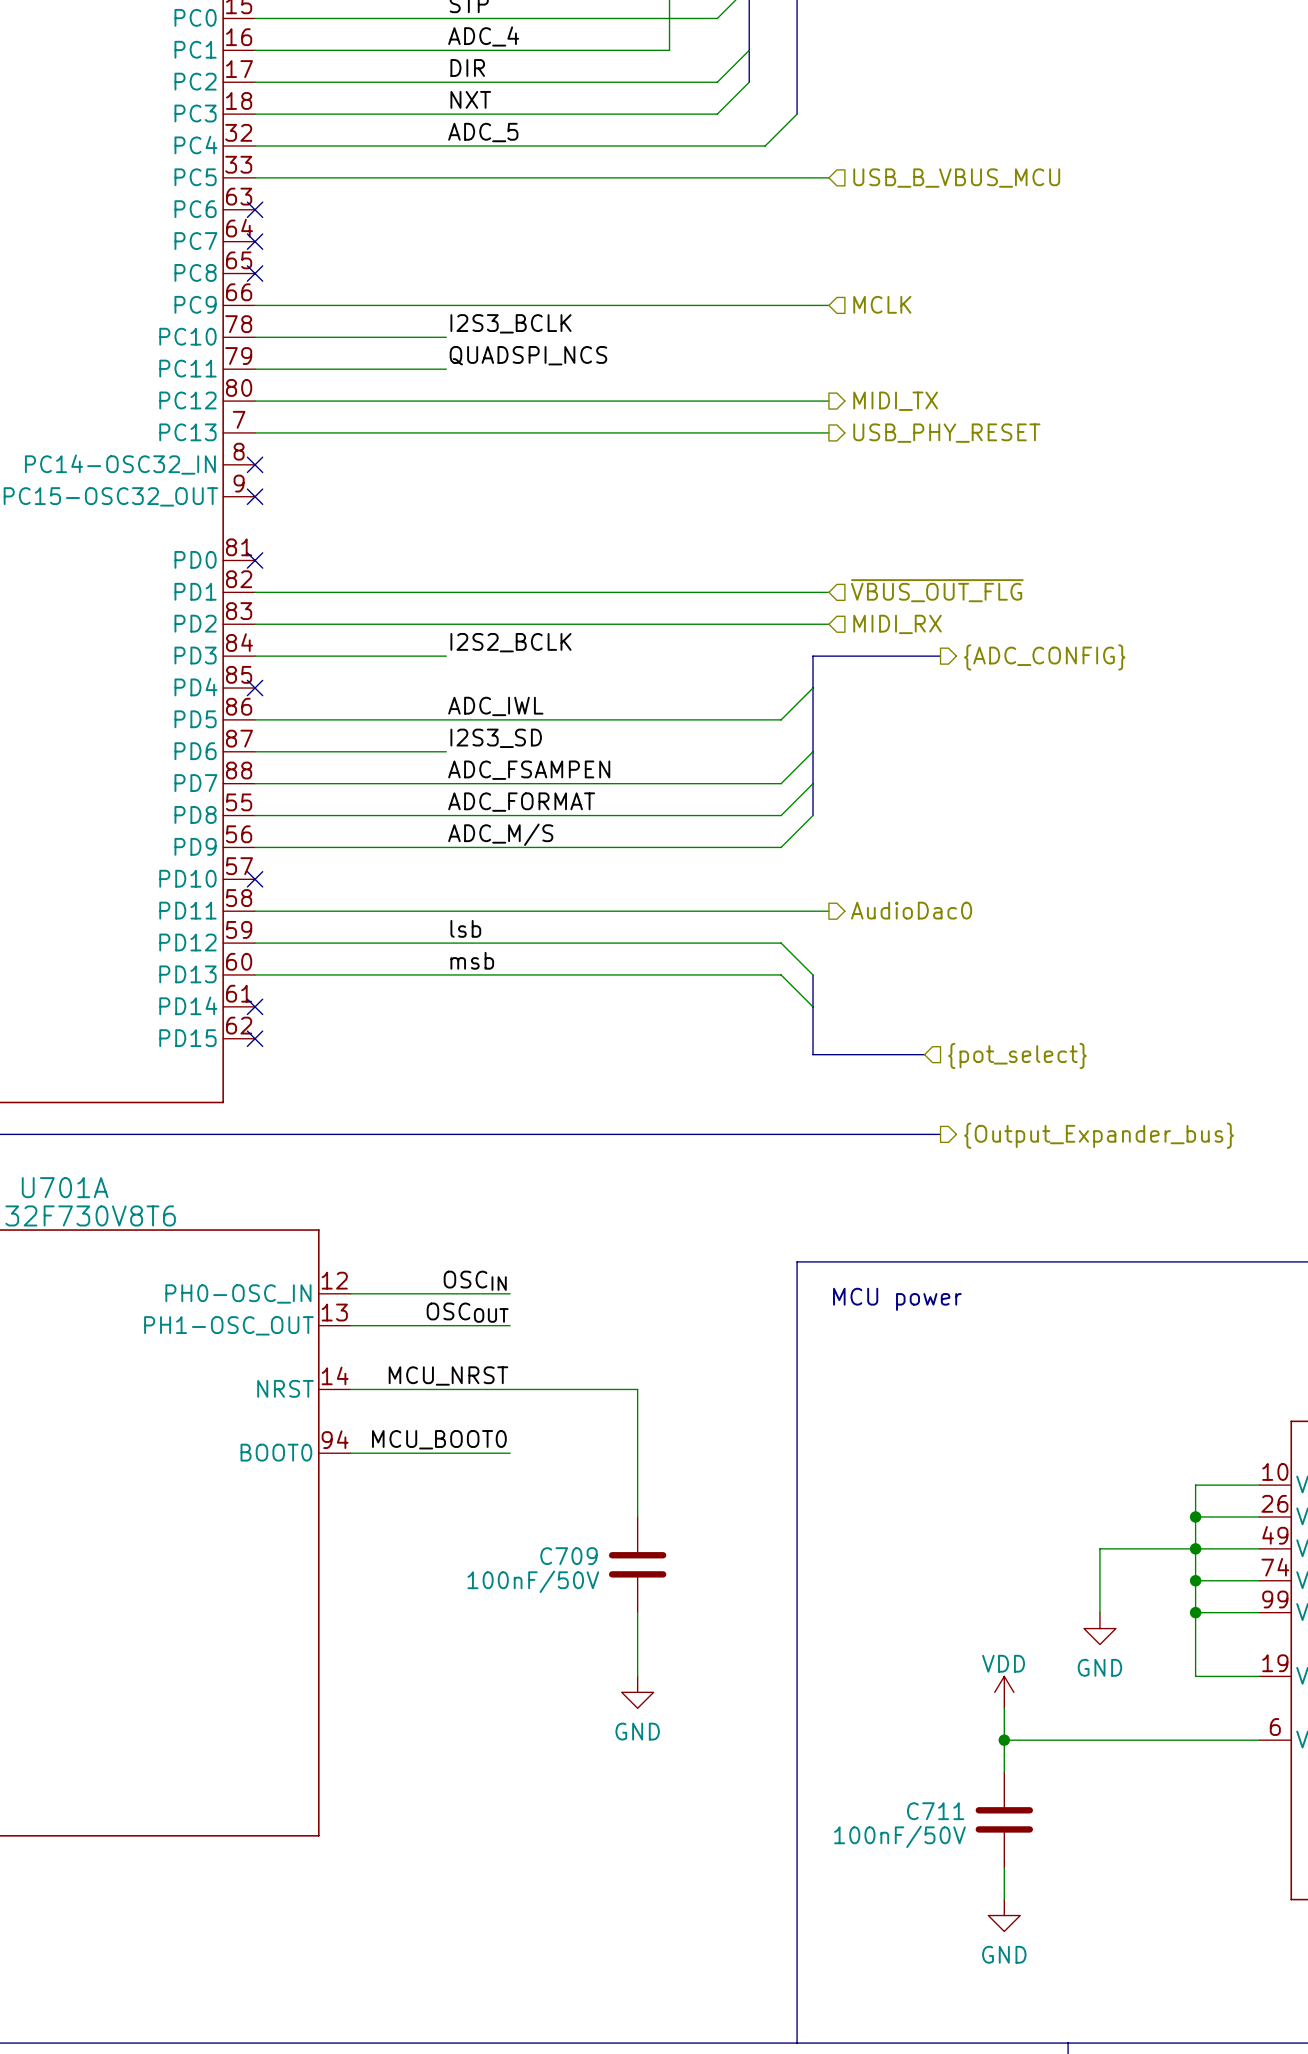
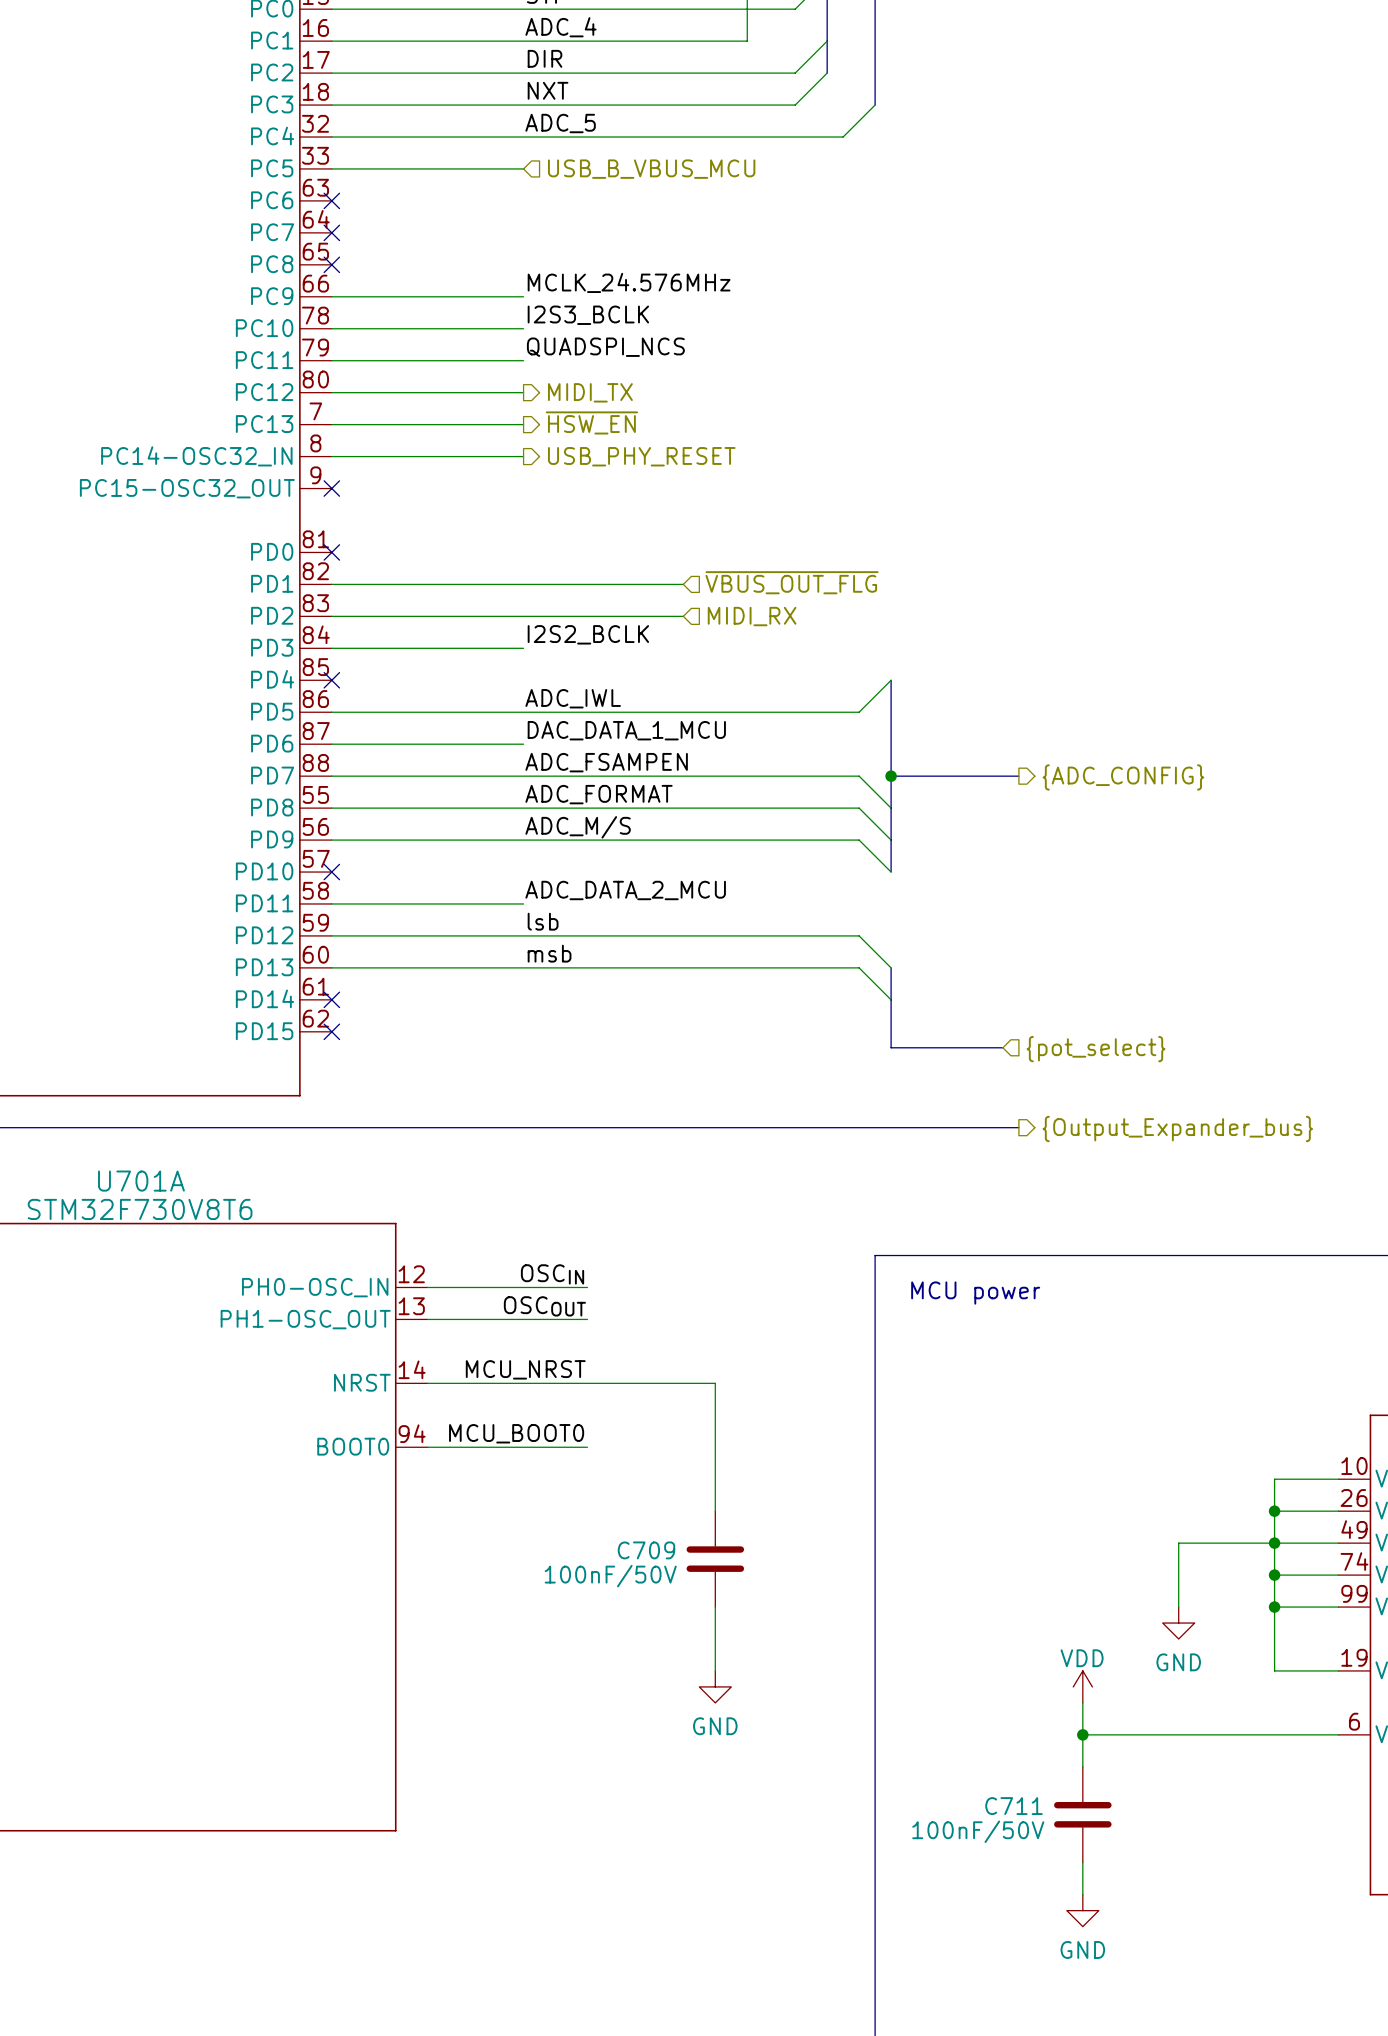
wire: (446, 177) (828, 177) -> none
hierarchical label: none -> USB_B_VBUS_MCU (651, 169)
hierarchical label: USB_B_VBUS_MCU (956, 178) -> none
label: none -> MCLK_24.576MHz (629, 282)
hierarchical label: MCLK (882, 304) -> none
wire: (446, 305) (828, 305) -> none
wire: (446, 401) (828, 401) -> none
hierarchical label: none -> MIDI_TX (590, 392)
hierarchical label: MIDI_TX (895, 401) -> none
hierarchical label: none -> ~{HSW_EN} (591, 422)
wire: (446, 432) (828, 432) -> none
hierarchical label: USB_PHY_RESET (946, 433) -> none
wire: none -> (331, 456) (523, 456)
no-connect mark: (255, 464) -> none
hierarchical label: none -> USB_PHY_RESET (641, 456)
hierarchical label position: ~{VBUS_OUT_FLG} (937, 590) -> ~{VBUS_OUT_FLG} (792, 582)
wire: (605, 592) (828, 592) -> none
wire: (605, 624) (828, 624) -> none
hierarchical label position: MIDI_RX (897, 624) -> MIDI_RX (752, 616)
bus: (940, 656) (813, 656) (813, 688) -> none
hierarchical label position: {ADC_CONFIG} (1044, 657) -> {ADC_CONFIG} (1123, 777)
label: I2S3_SD (496, 738) -> DAC_DATA_1_MCU (626, 730)
wire: (813, 751) (781, 783) -> none
wire: (813, 783) (781, 815) -> (891, 840) (859, 808)
bus: none -> (891, 776) (1018, 776)
junction: none -> (891, 776)
wire: (813, 815) (781, 847) -> (891, 808) (859, 776)
bus: none -> (891, 808) (891, 872)
wire: none -> (859, 840) (891, 872)
label: none -> ADC_DATA_2_MCU (625, 890)
hierarchical label: AudioDac0 (911, 910) -> none
wire: (446, 911) (828, 911) -> none

